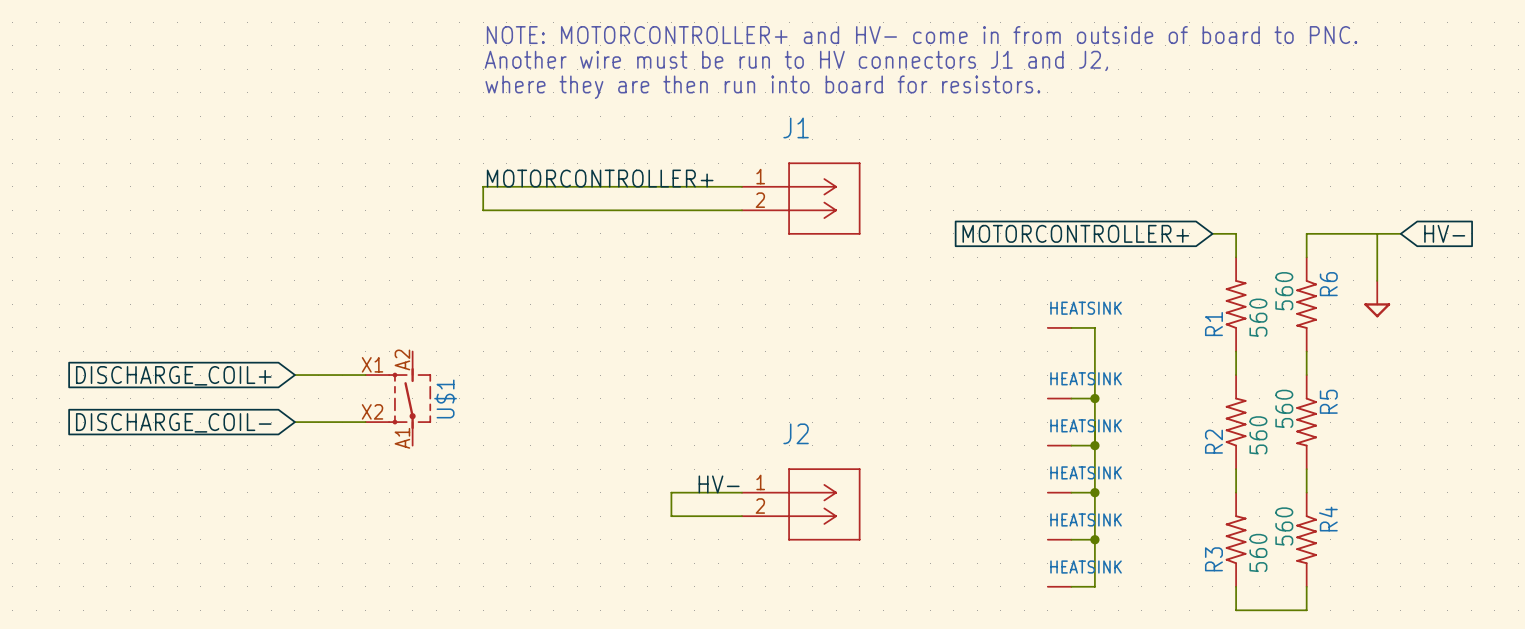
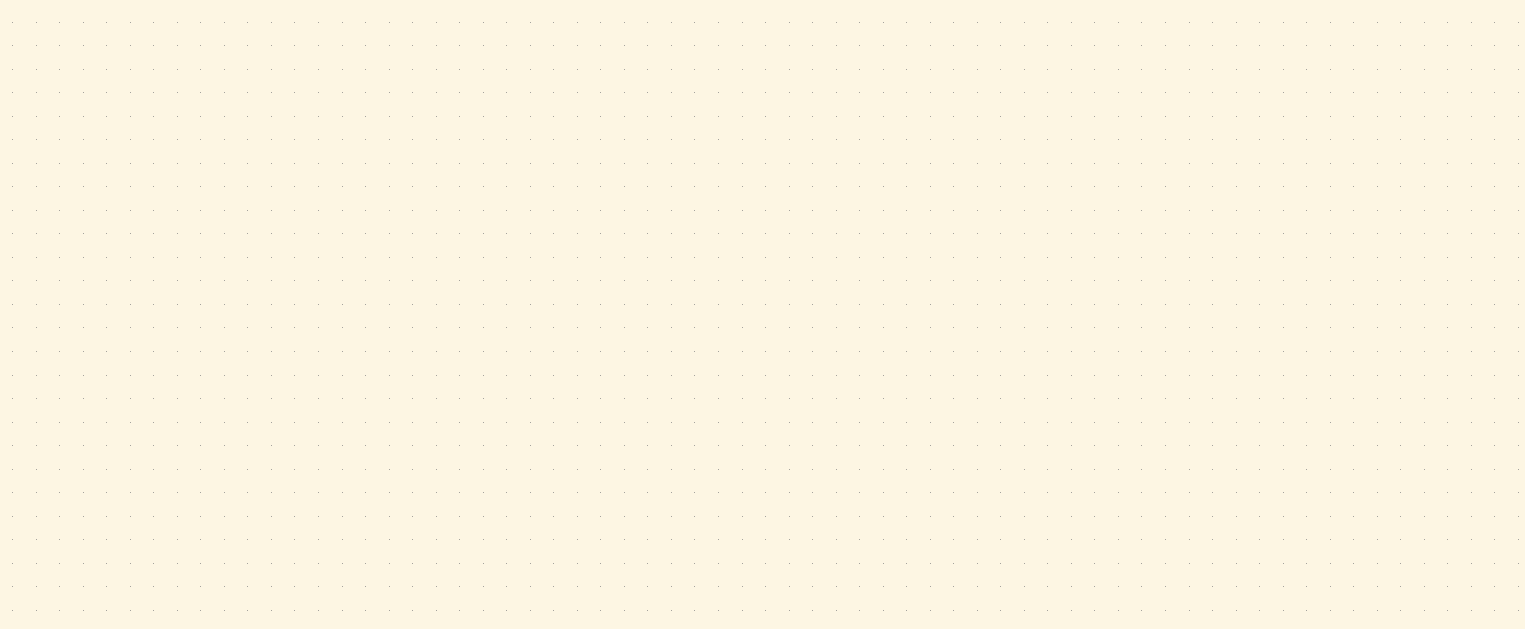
text: NOTE: MOTORCONTROLLER+ and HV- come in from outside of board to PNC. (922, 35) -> none
text: Another wire must be run to HV connectors J1 and J2, (796, 60) -> none
text: where they are then run into board for resistors. (762, 87) -> none
label: MOTORCONTROLLER+ (600, 178) -> none
wire: (742, 186) (483, 186) (483, 210) (742, 210) -> none
J1: (801, 198) -> none
global label: MOTORCONTROLLER+ (1075, 233) -> none
wire: (1212, 233) (1236, 233) (1236, 257) -> none
wire: (1377, 233) (1377, 280) -> none
wire: (1400, 233) (1306, 233) (1306, 257) -> none
global label: HV- (1444, 233) -> none
power symbol: (1377, 299) -> none
R1: 560 (1236, 304) -> none
R6: 560 (1306, 304) -> none
part: (1059, 327) -> none
wire: (1071, 327) (1094, 327) (1094, 586) (1071, 586) -> none
wire: (1236, 351) (1236, 375) -> none
wire: (1306, 351) (1306, 375) -> none
global label: DISCHARGE_COIL+ (173, 375) -> none
wire: (294, 375) (365, 375) -> none
U$1: (398, 398) -> none
part: (1059, 398) -> none
wire: (1071, 398) (1094, 398) -> none
junction: (1094, 398) -> none
global label: DISCHARGE_COIL- (173, 422) -> none
wire: (294, 422) (365, 422) -> none
R2: 560 (1236, 422) -> none
R5: 560 (1306, 422) -> none
part: (1059, 445) -> none
wire: (1071, 445) (1094, 445) -> none
junction: (1094, 445) -> none
wire: (1236, 469) (1236, 492) -> none
wire: (1306, 469) (1306, 492) -> none
label: HV- (719, 484) -> none
wire: (742, 492) (671, 492) (671, 516) (742, 516) -> none
part: (1059, 492) -> none
wire: (1071, 492) (1094, 492) -> none
junction: (1094, 492) -> none
J2: (801, 504) -> none
part: (1059, 539) -> none
wire: (1071, 539) (1094, 539) -> none
junction: (1094, 539) -> none
R3: 560 (1236, 539) -> none
R4: 560 (1306, 539) -> none
part: (1059, 586) -> none
wire: (1236, 586) (1236, 610) (1306, 610) (1306, 586) -> none

